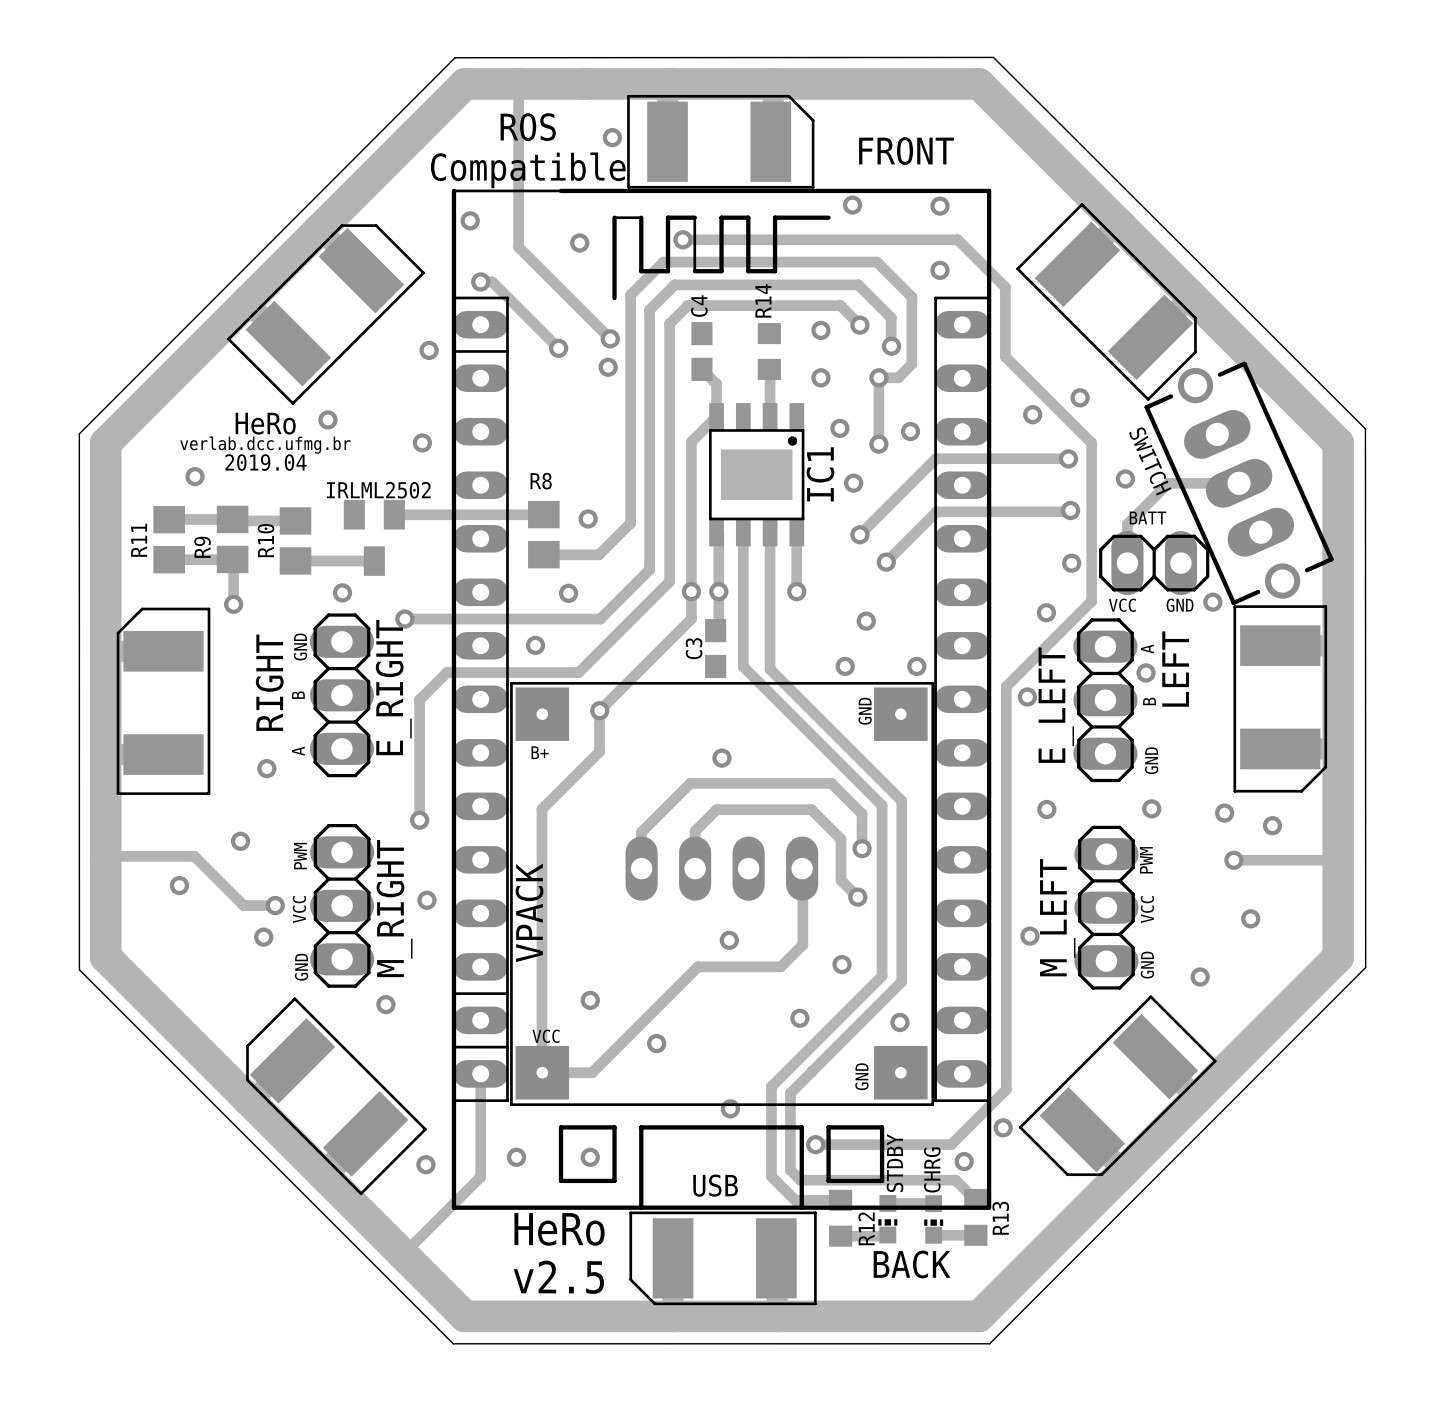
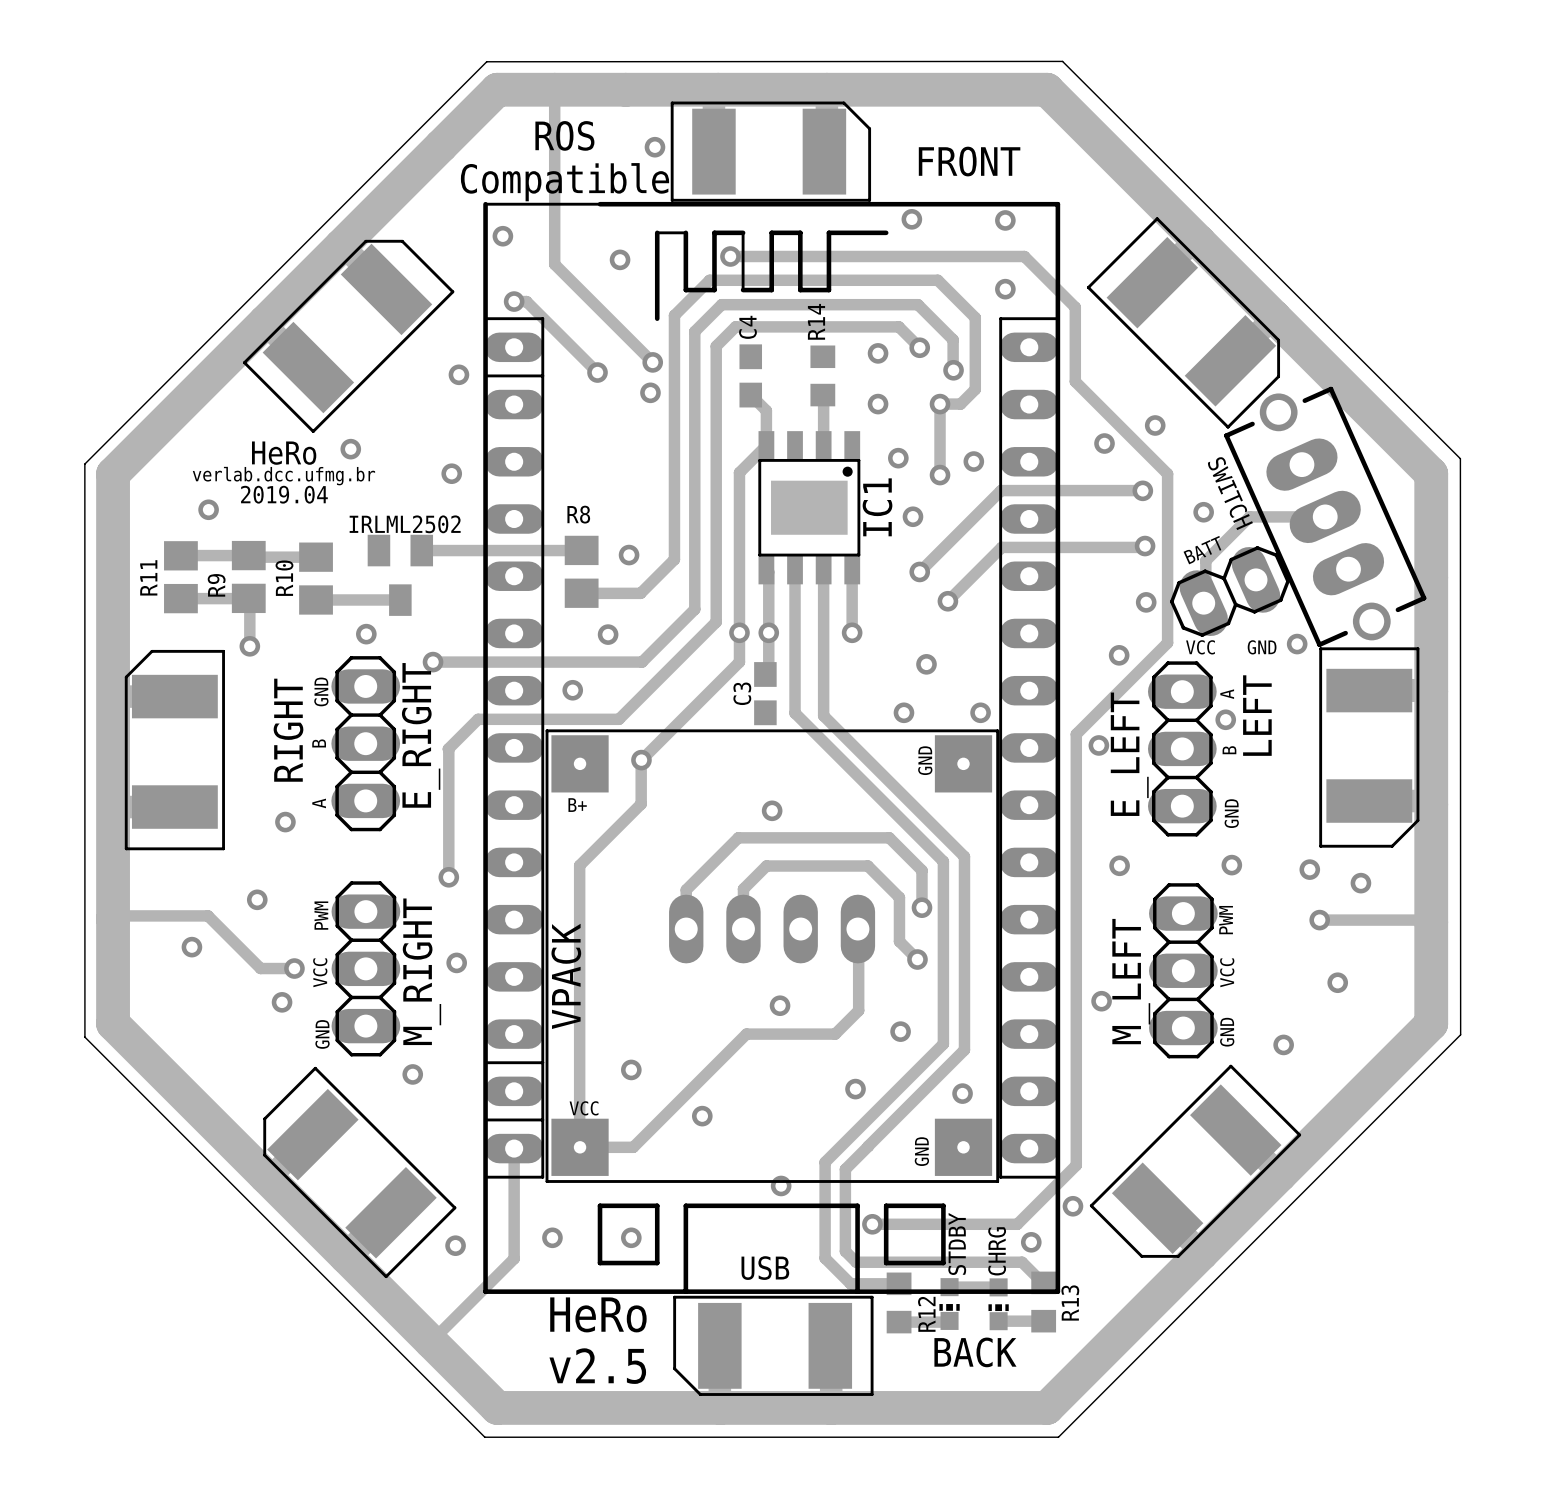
BATT rotation: 0° (1154, 563) -> 24° counterclockwise (1229, 591)

